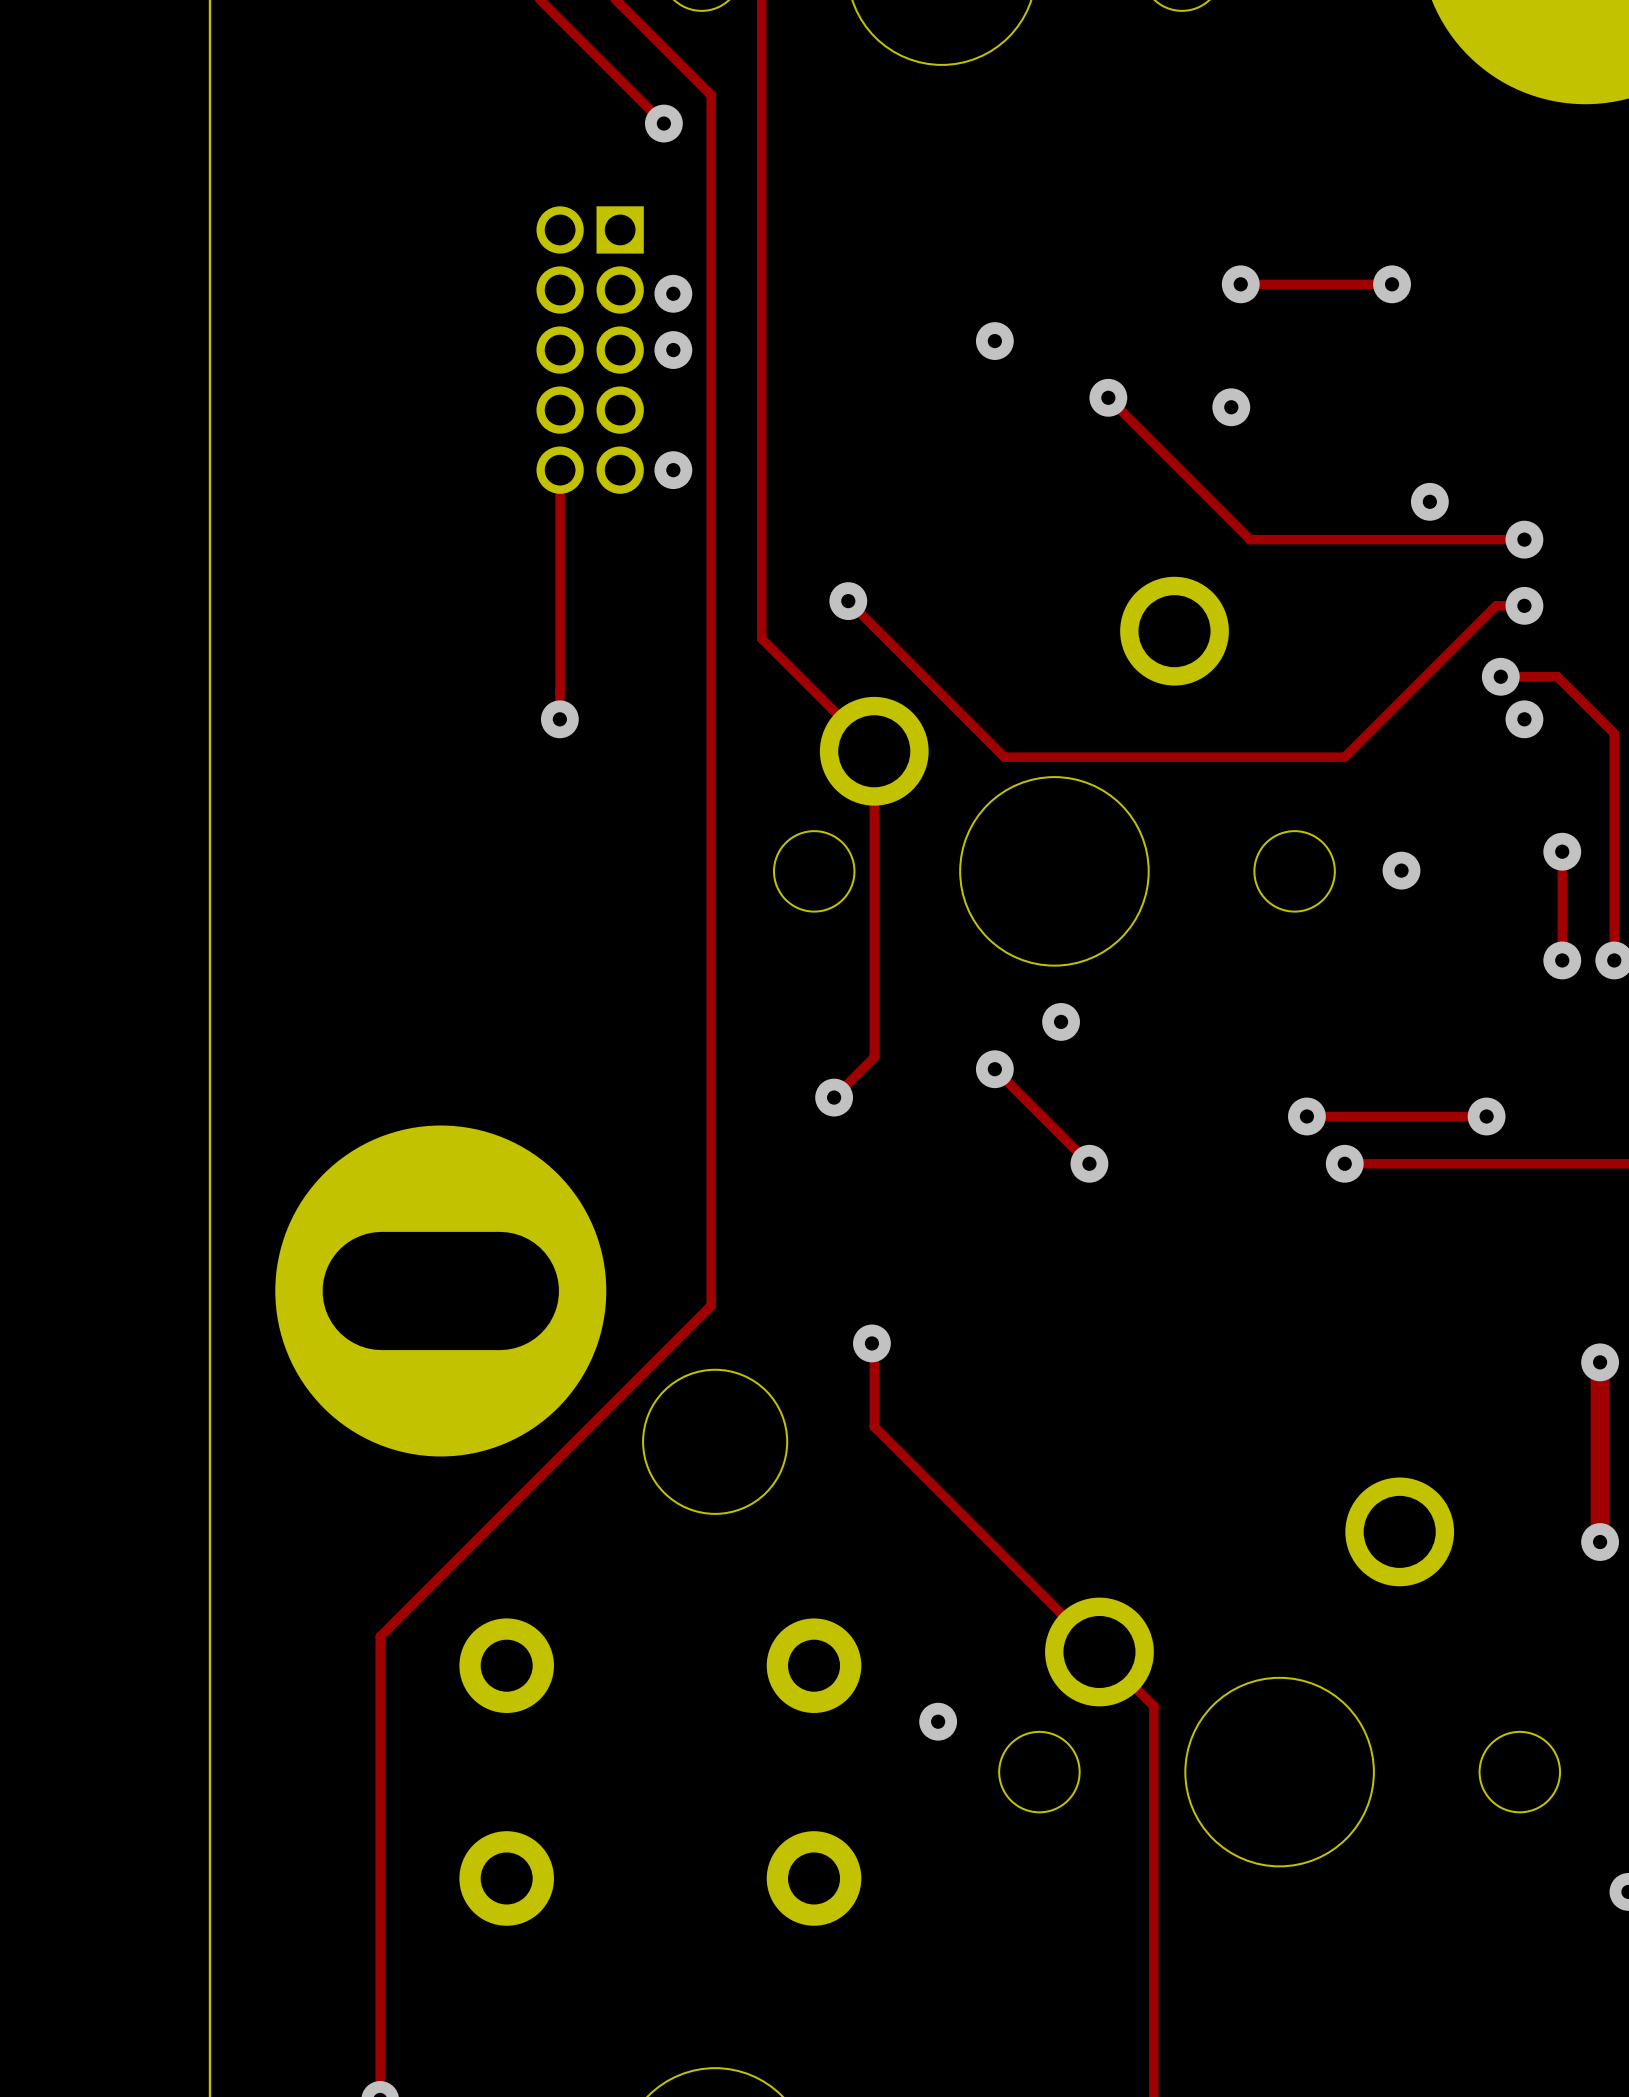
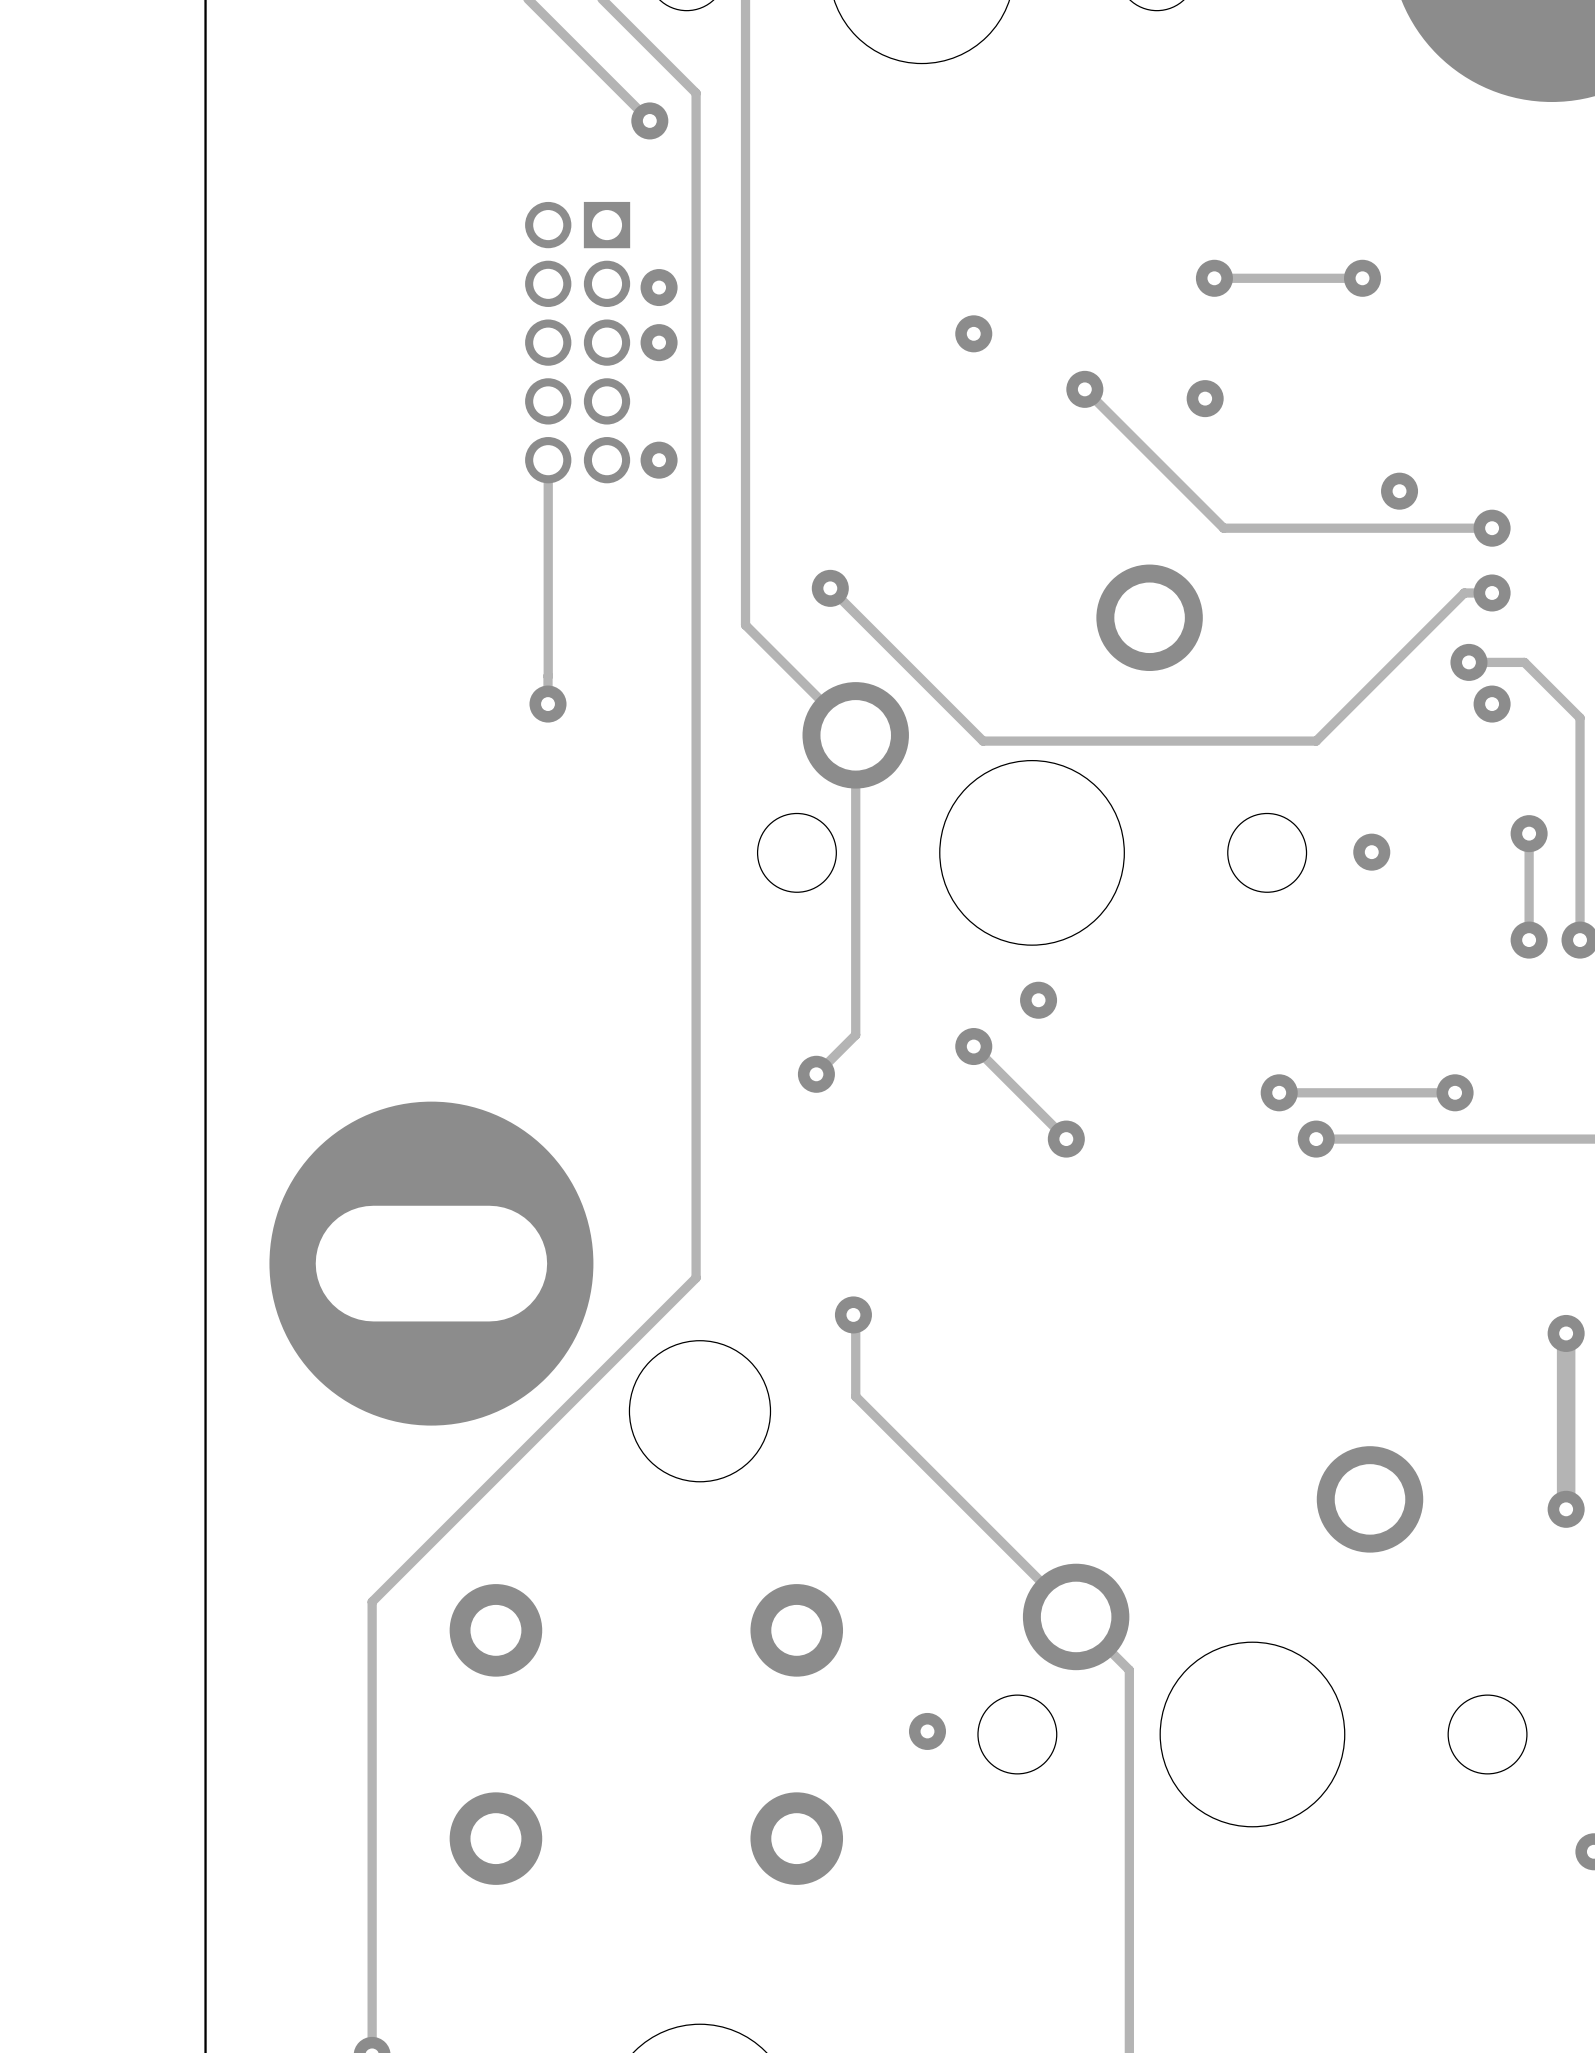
via position: (938, 1721) -> (927, 1731)

